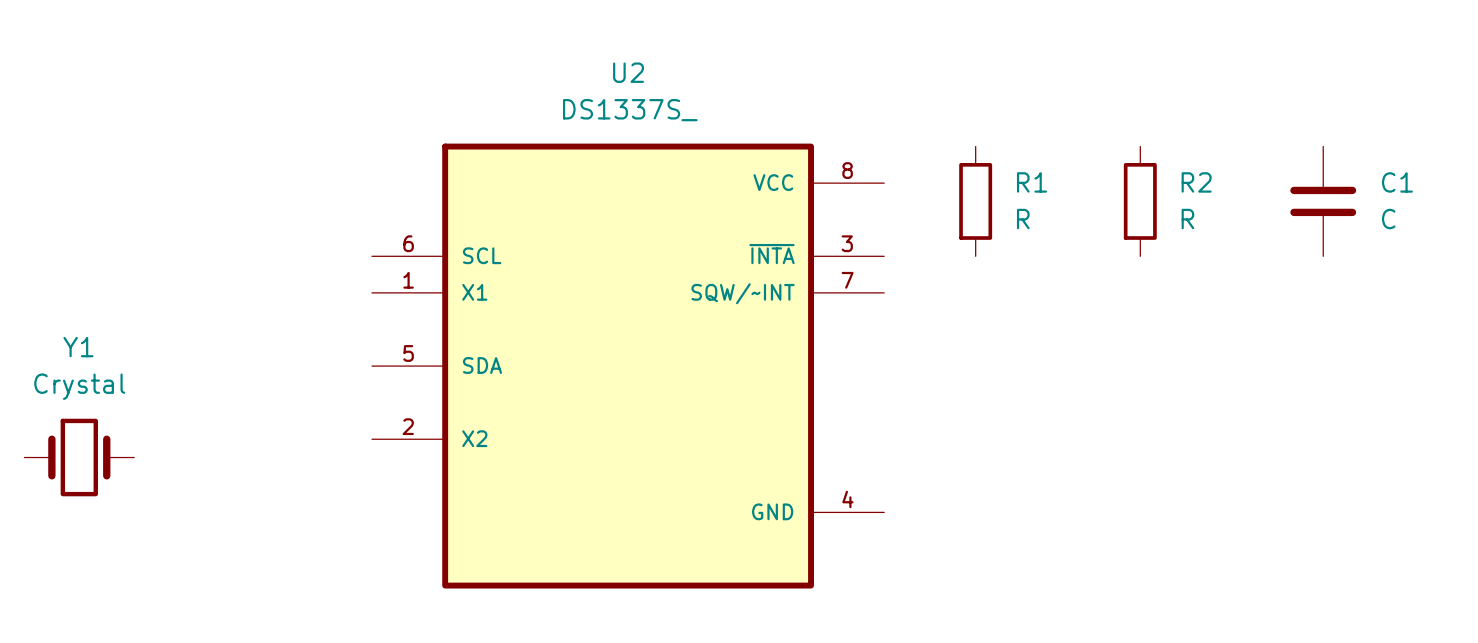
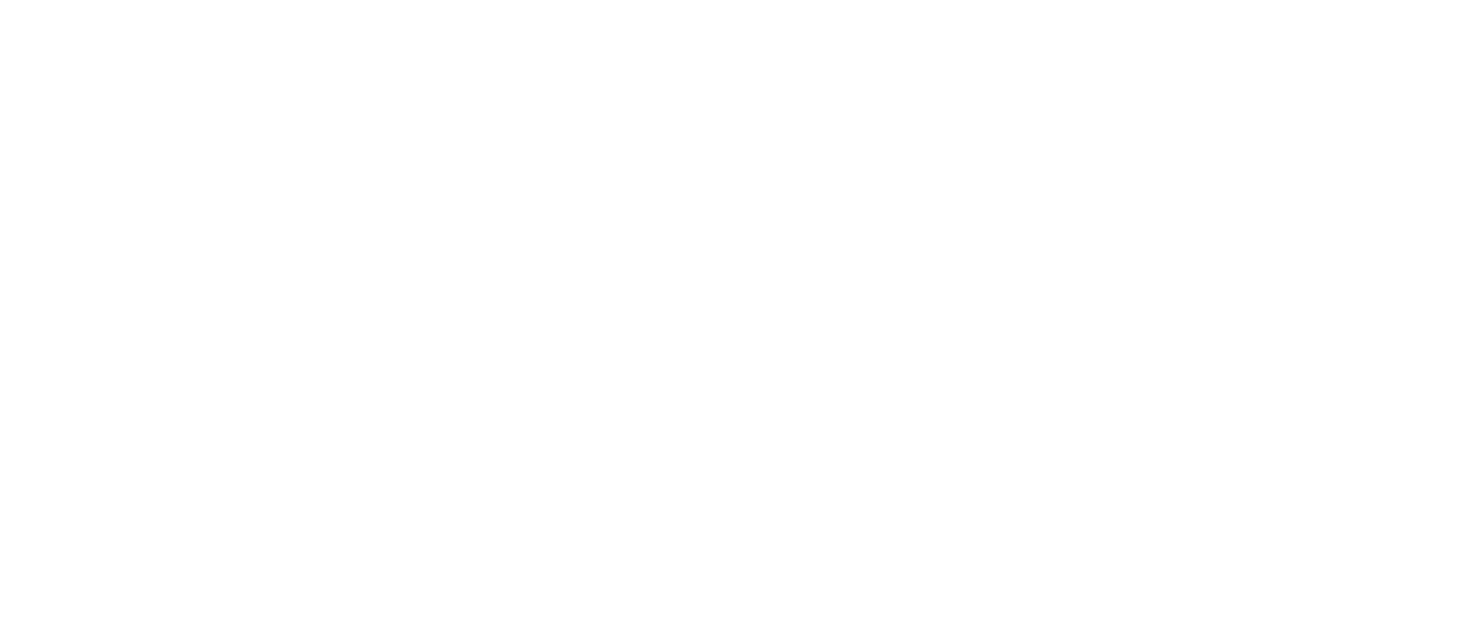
R1: R (975, 201) -> none
R2: R (1140, 201) -> none
C1: C (1323, 201) -> none
U2: DS1337S_ (628, 366) -> none
Y1: Crystal (79, 457) -> none

